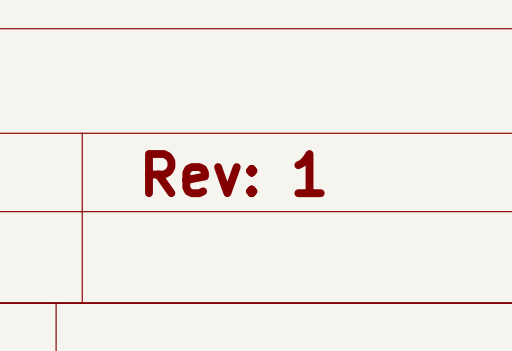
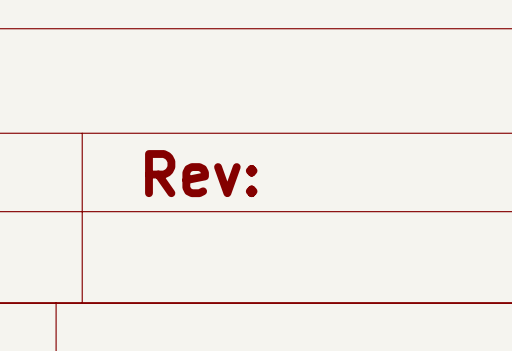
title block: Rev: 1 (234, 173) -> Rev: (201, 173)

